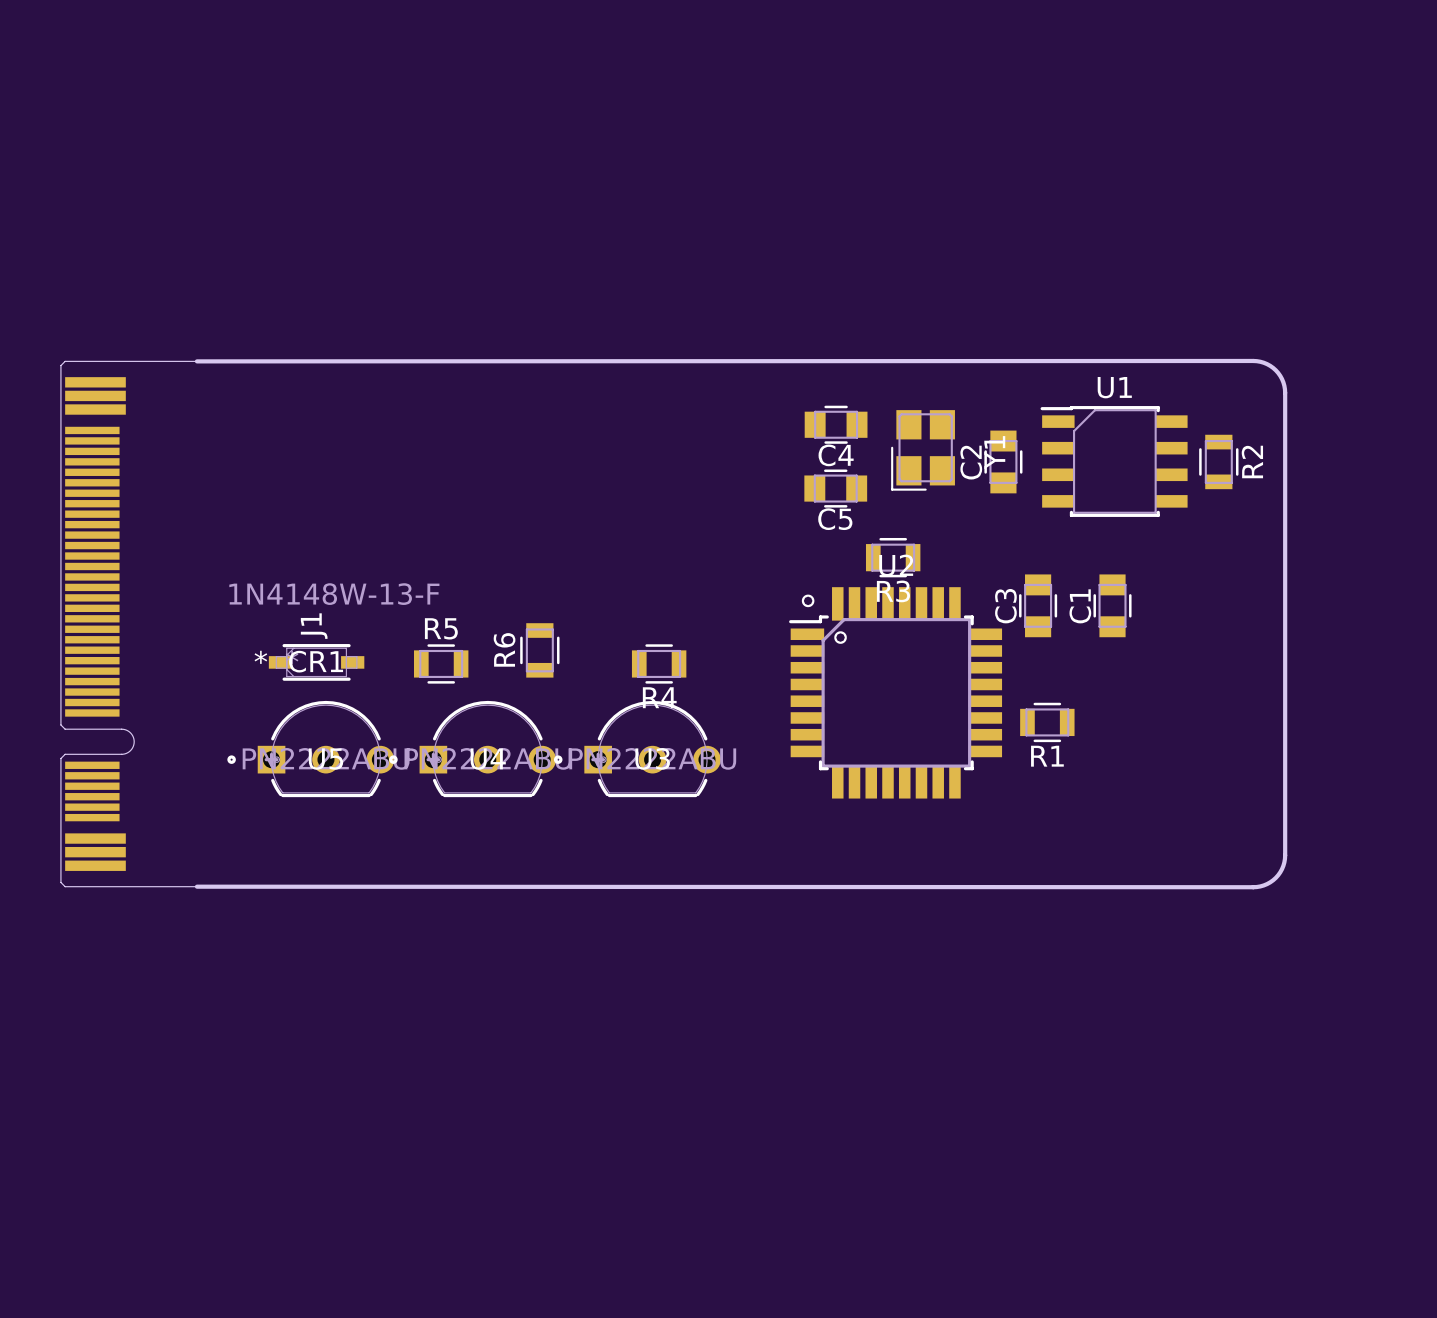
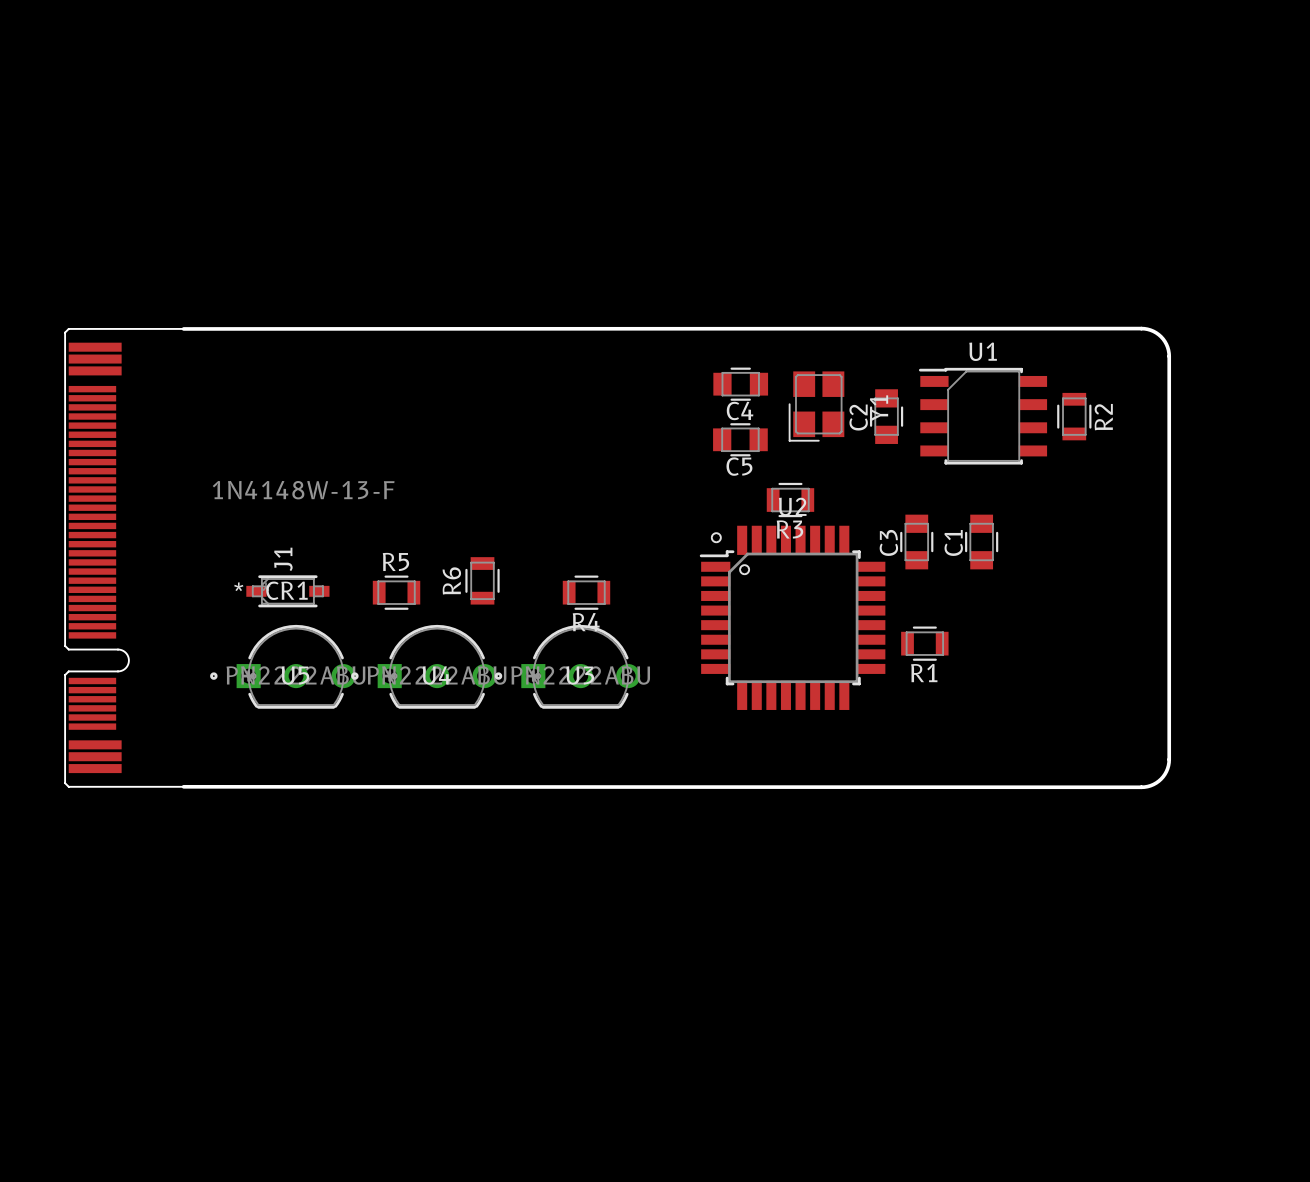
board edge: (1253, 360) (1263, 362) (1275, 370) (1283, 382) (1285, 392) (1285, 855) (1280, 872) (1267, 884) (1253, 887) (196, 886) -> (1104, 328) (1150, 330) (1163, 339) (1169, 353) (1169, 759) (1164, 774) (1153, 784) (1141, 787) (183, 786)
CR1 value position: 1N4148W-13-F (334, 594) -> 1N4148W-13-F (303, 490)

